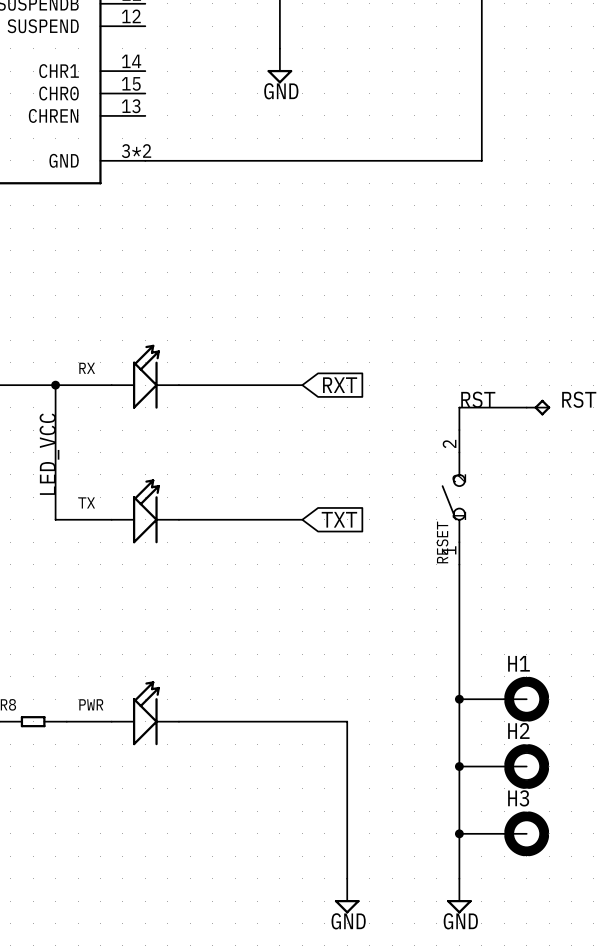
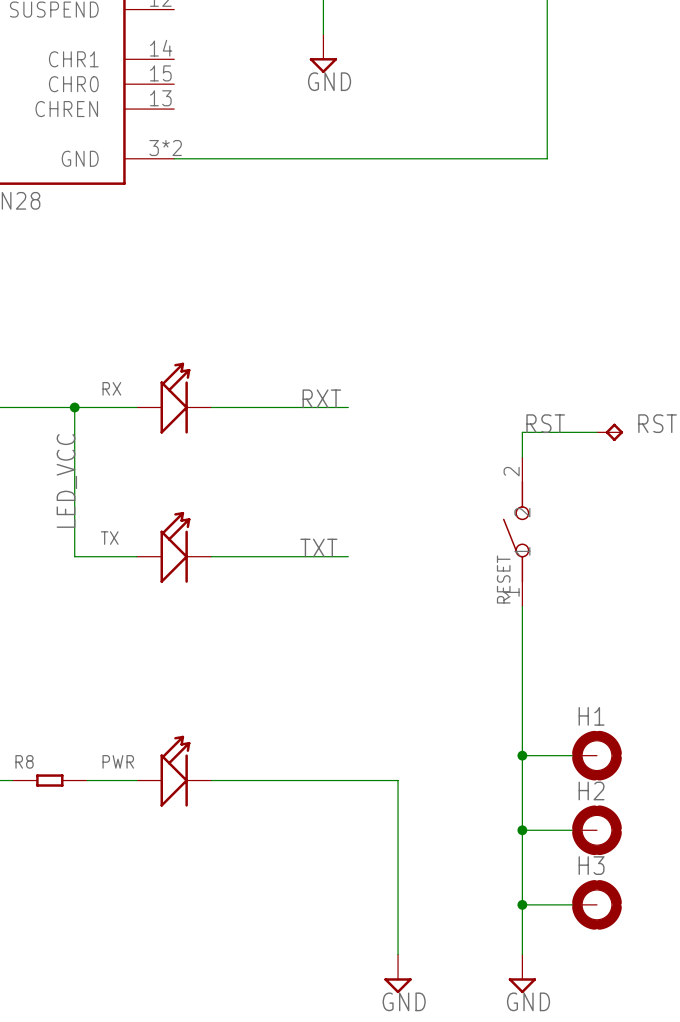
label: none -> RXT (321, 398)
global label: RXT (340, 385) -> none
label: none -> TXT (318, 548)
global label: TXT (339, 519) -> none

